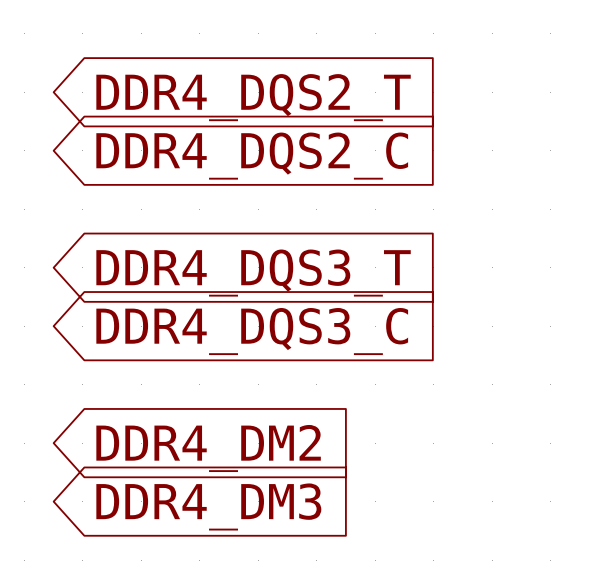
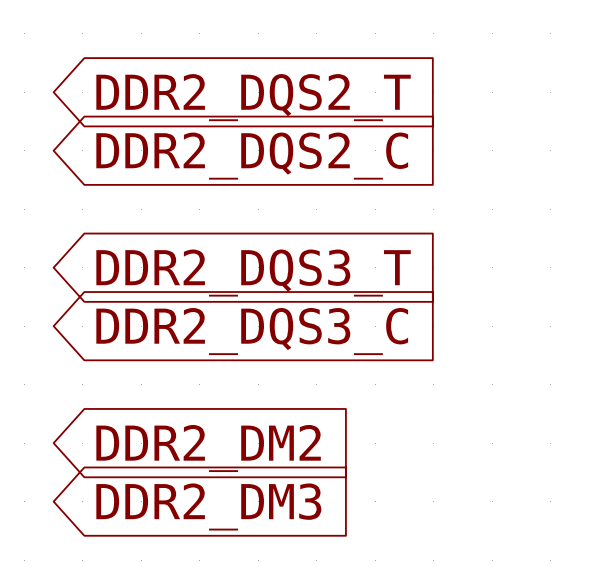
global label: DDR4_DQS2_T (253, 97) -> DDR2_DQS2_T (253, 97)
global label: DDR4_DQS2_C (252, 156) -> DDR2_DQS2_C (252, 156)
global label: DDR4_DQS3_T (253, 273) -> DDR2_DQS3_T (253, 273)
global label: DDR4_DQS3_C (252, 331) -> DDR2_DQS3_C (252, 331)
global label: DDR4_DM2 (208, 448) -> DDR2_DM2 (208, 448)
global label: DDR4_DM3 (208, 506) -> DDR2_DM3 (208, 506)

